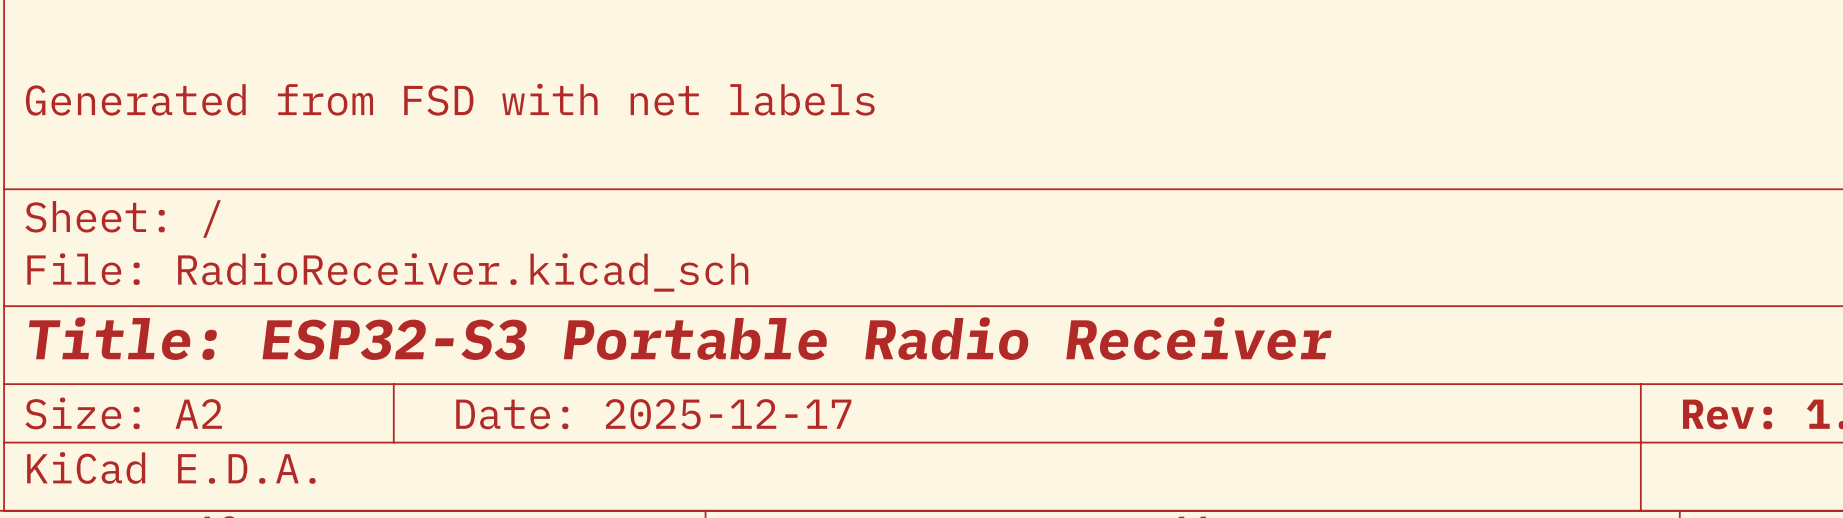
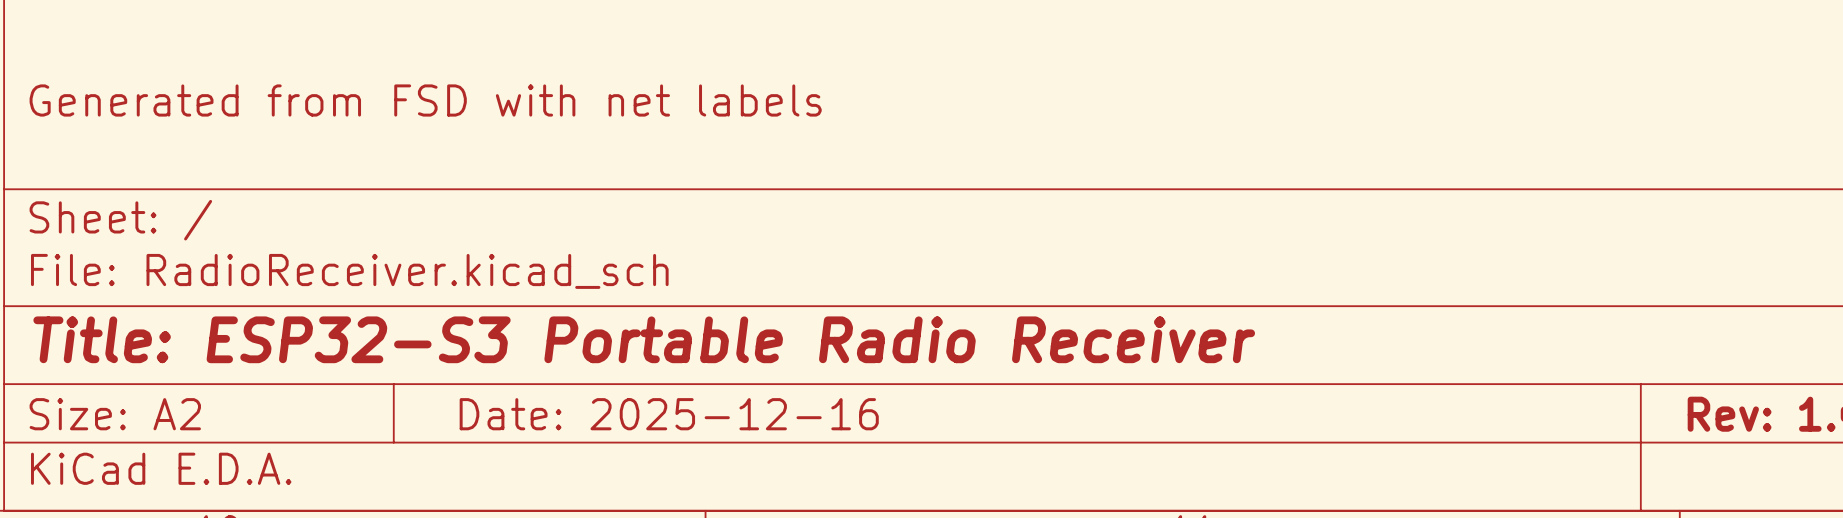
title block: Date: 2025-12-17 (653, 414) -> Date: 2025-12-16 (669, 414)

